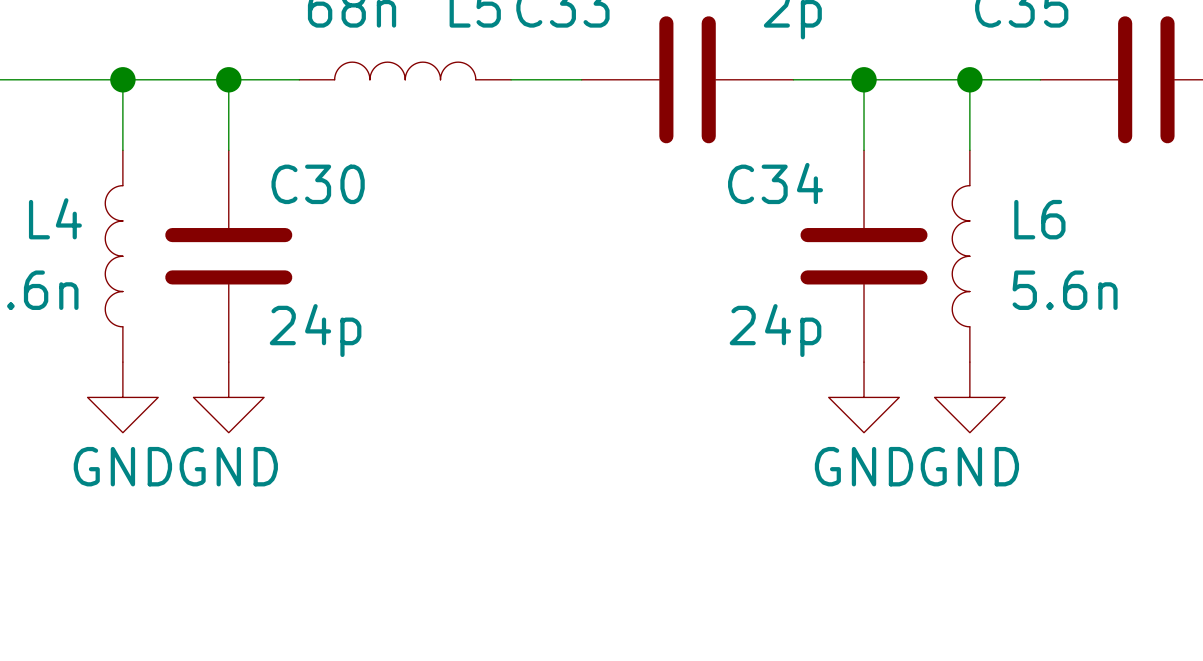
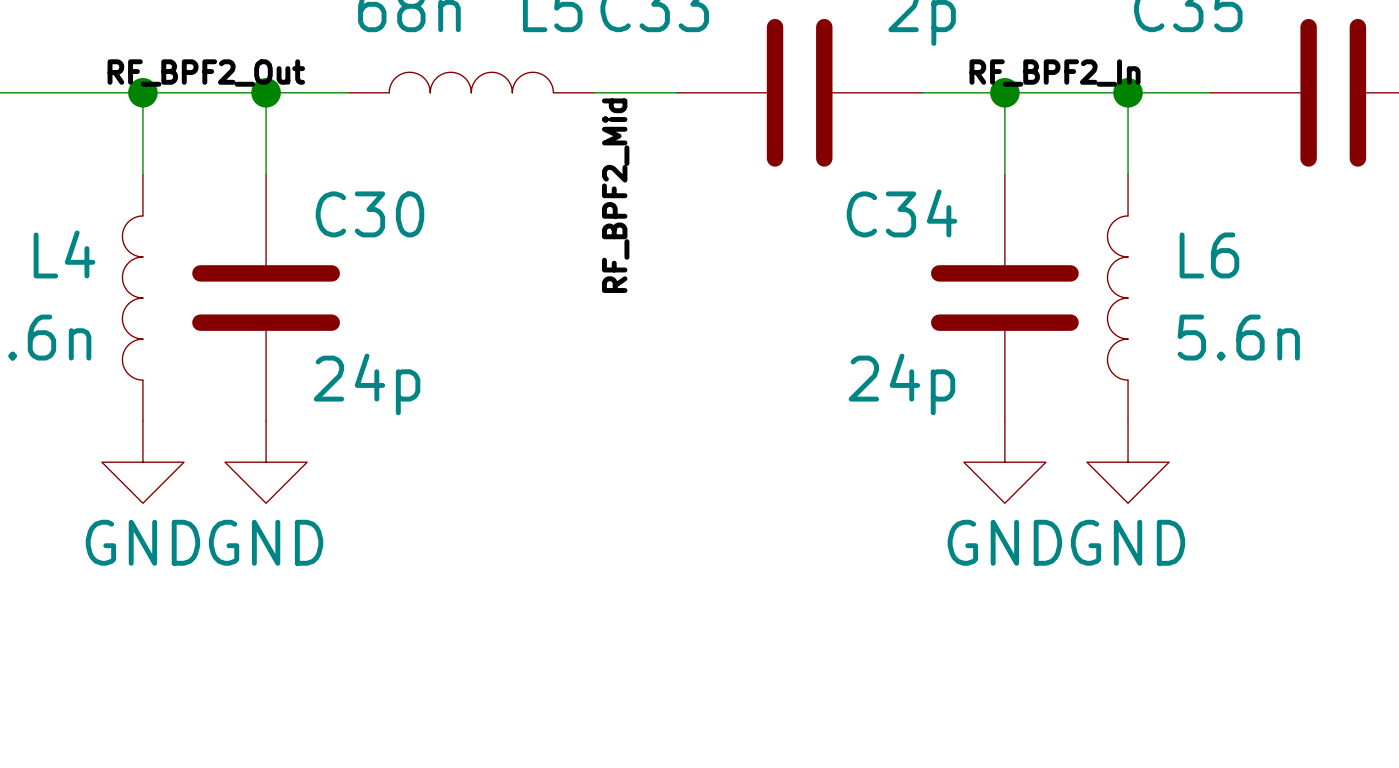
label: none -> RF_BPF2_Out (206, 73)
label: none -> RF_BPF2_In (1055, 73)
label: none -> RF_BPF2_Mid (615, 195)

